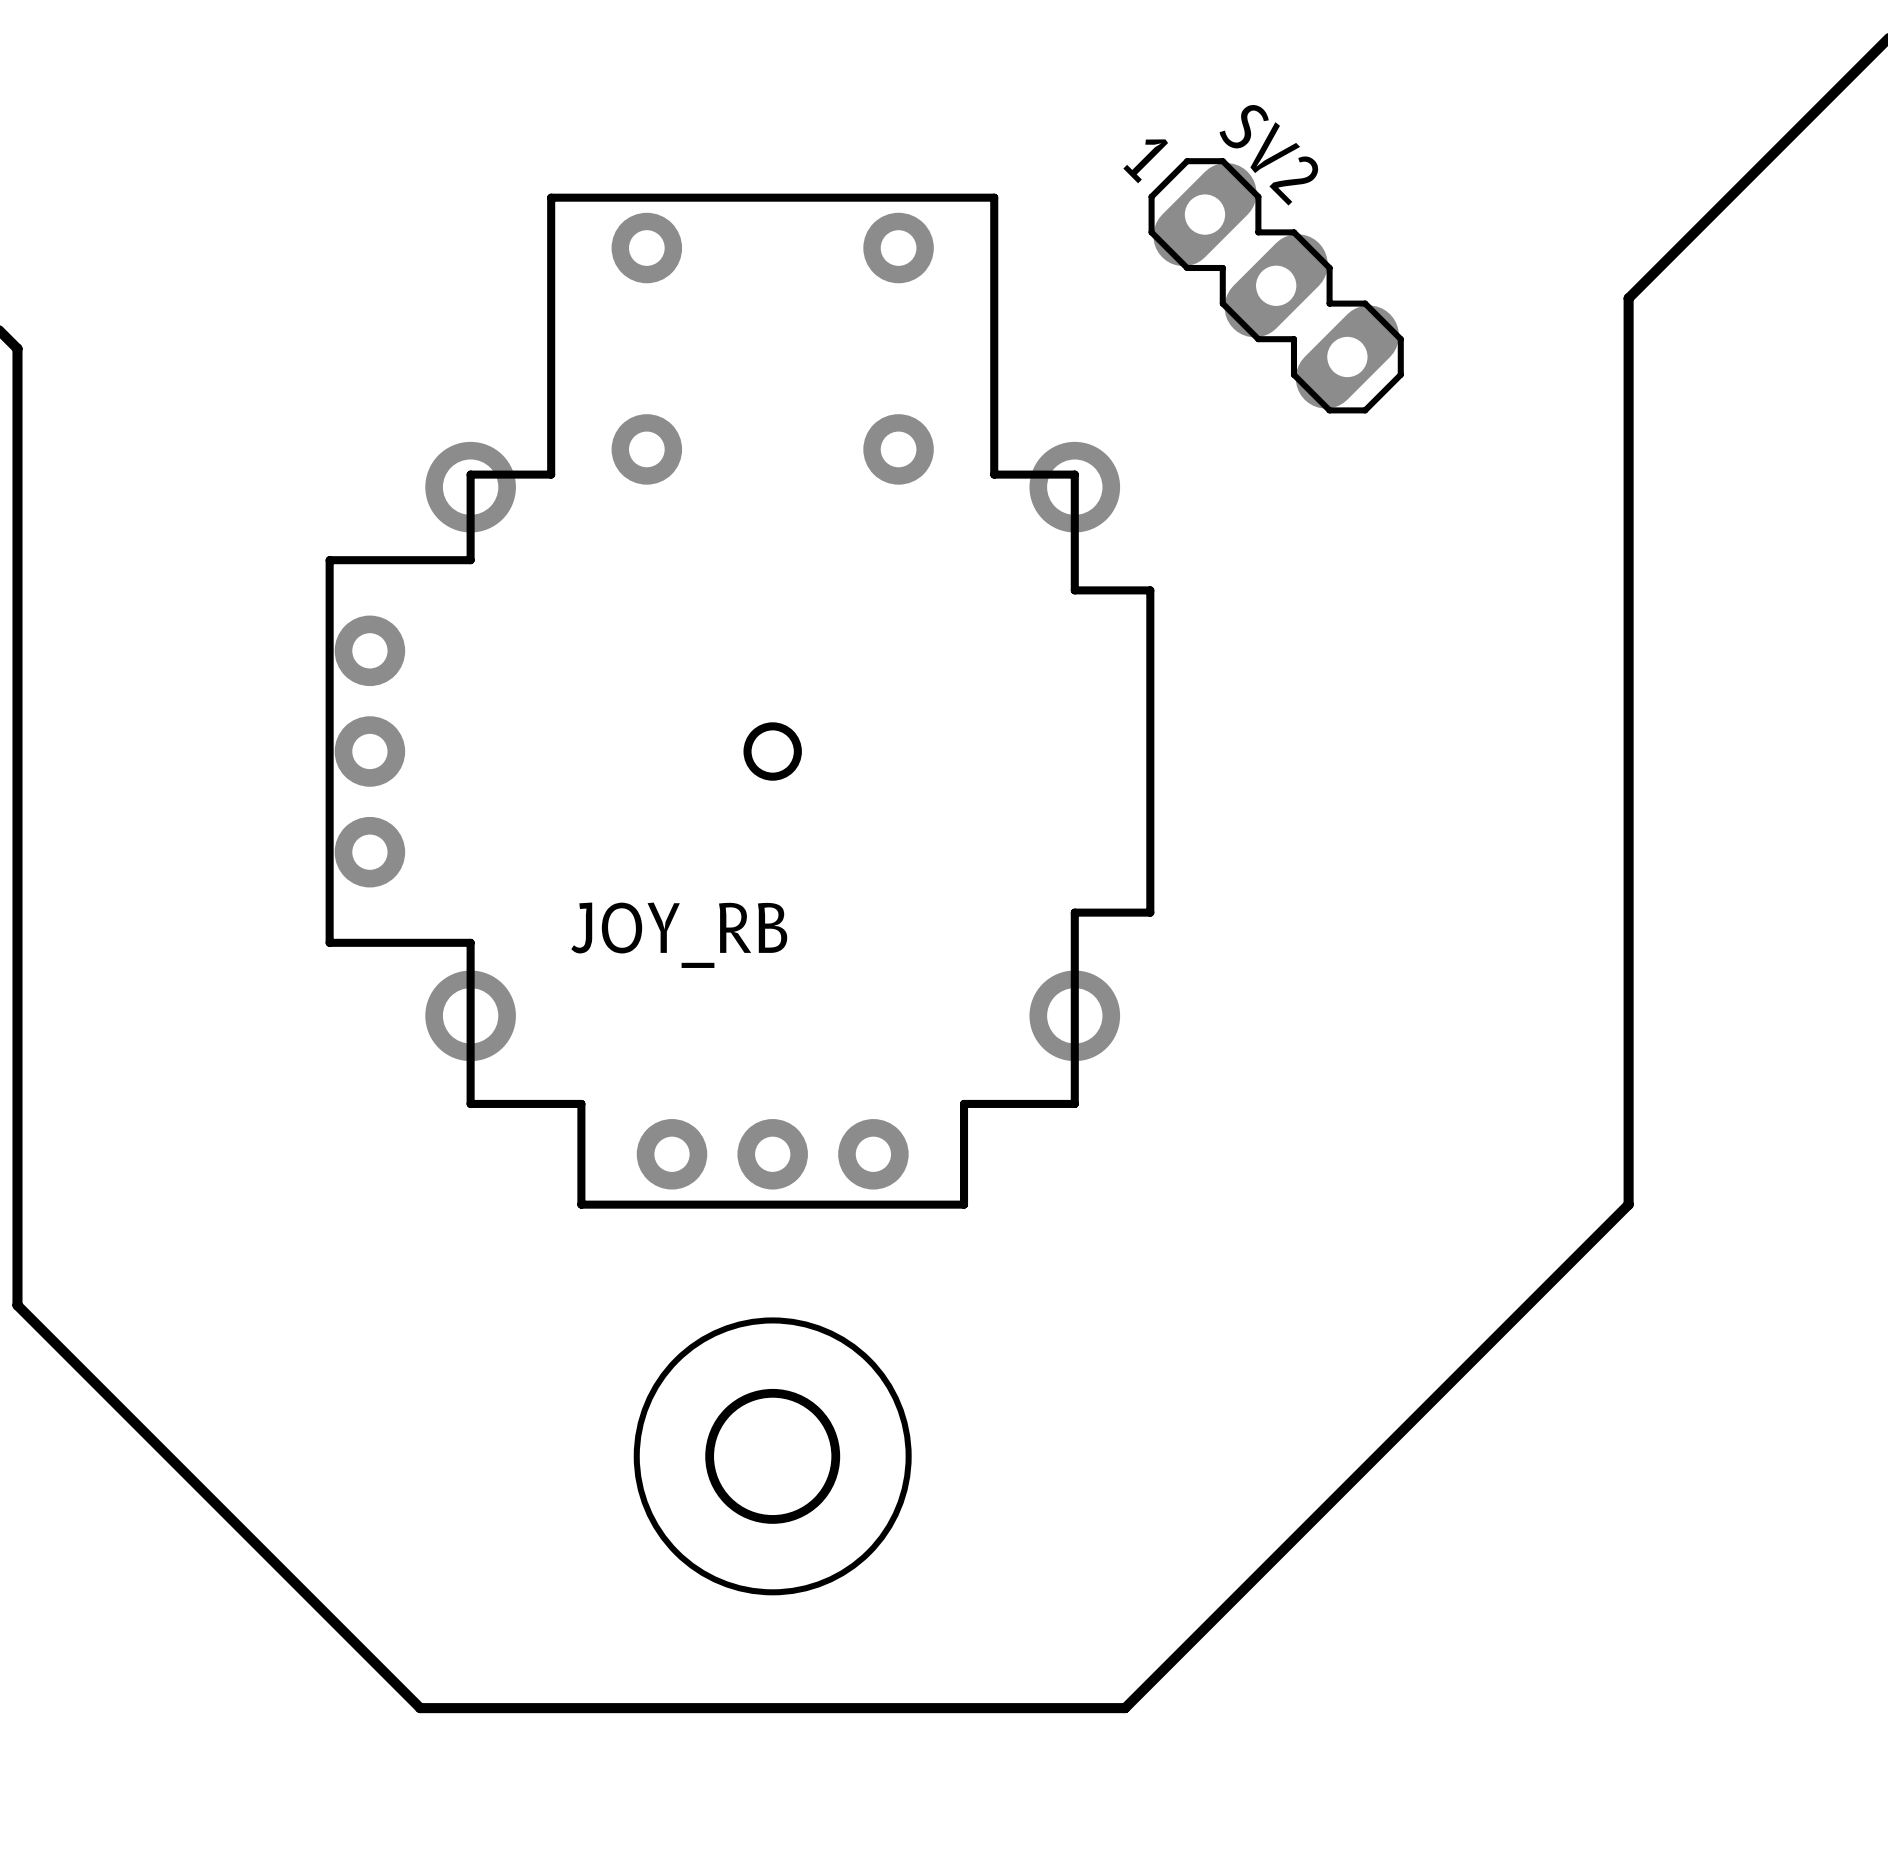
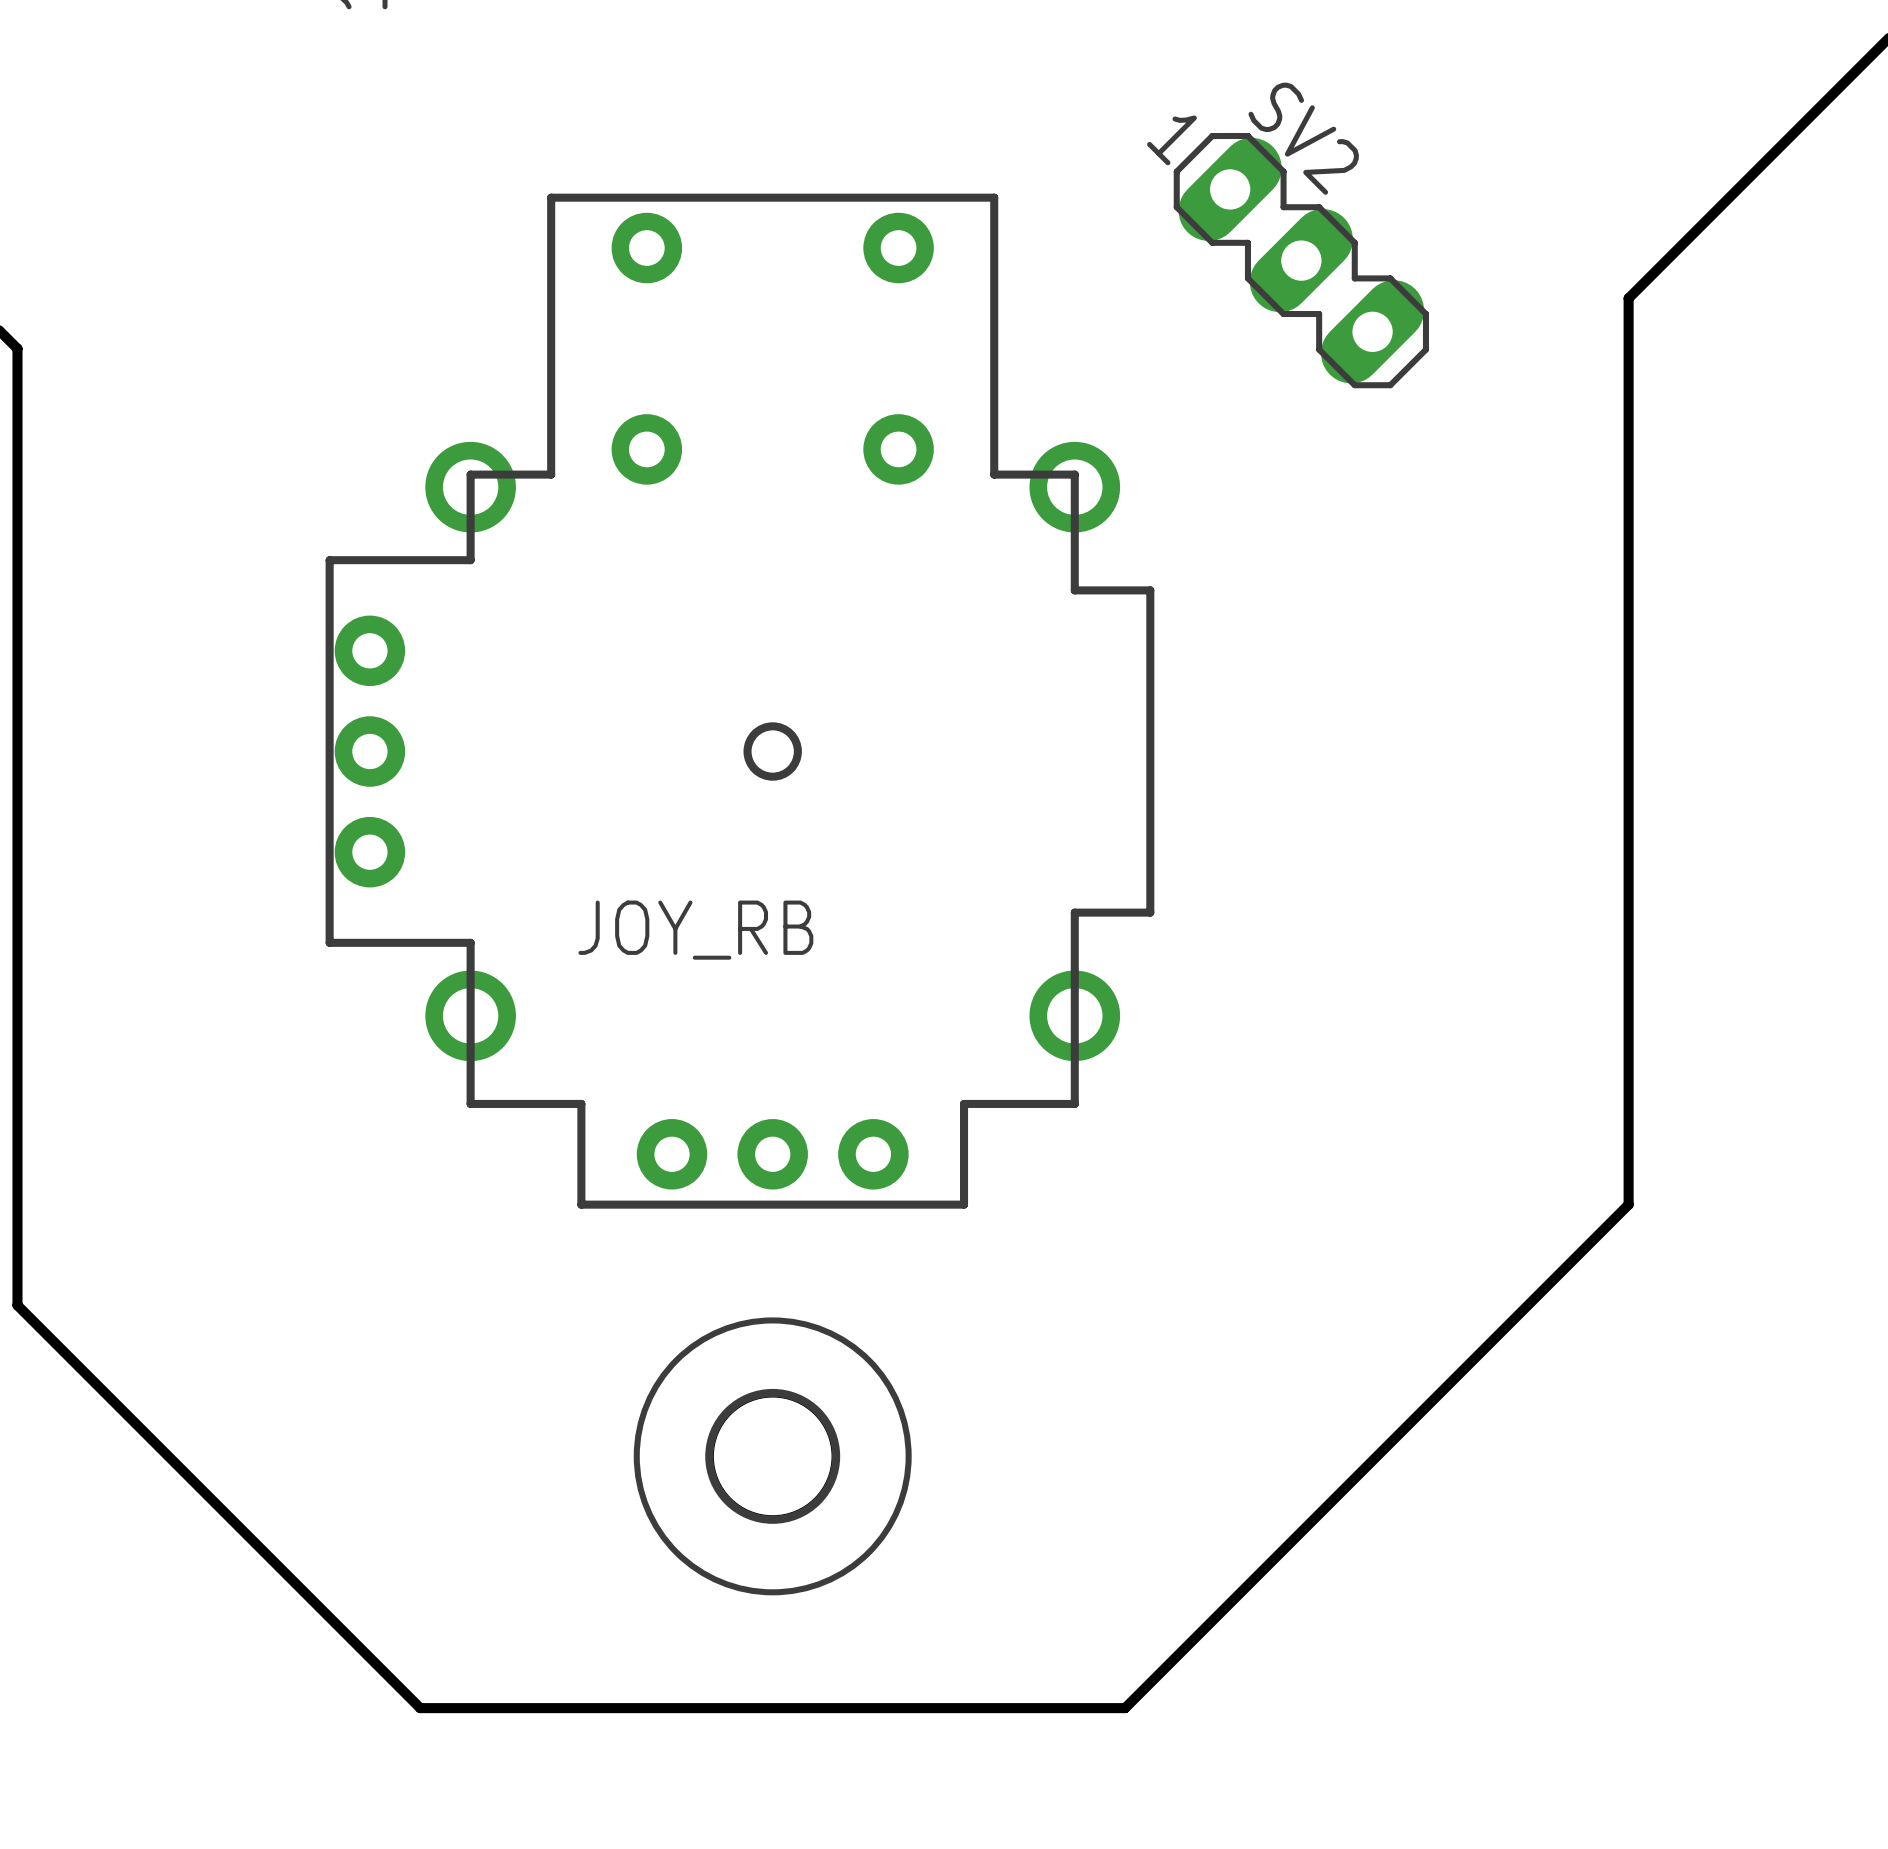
SV2 position: (1276, 285) -> (1301, 260)

